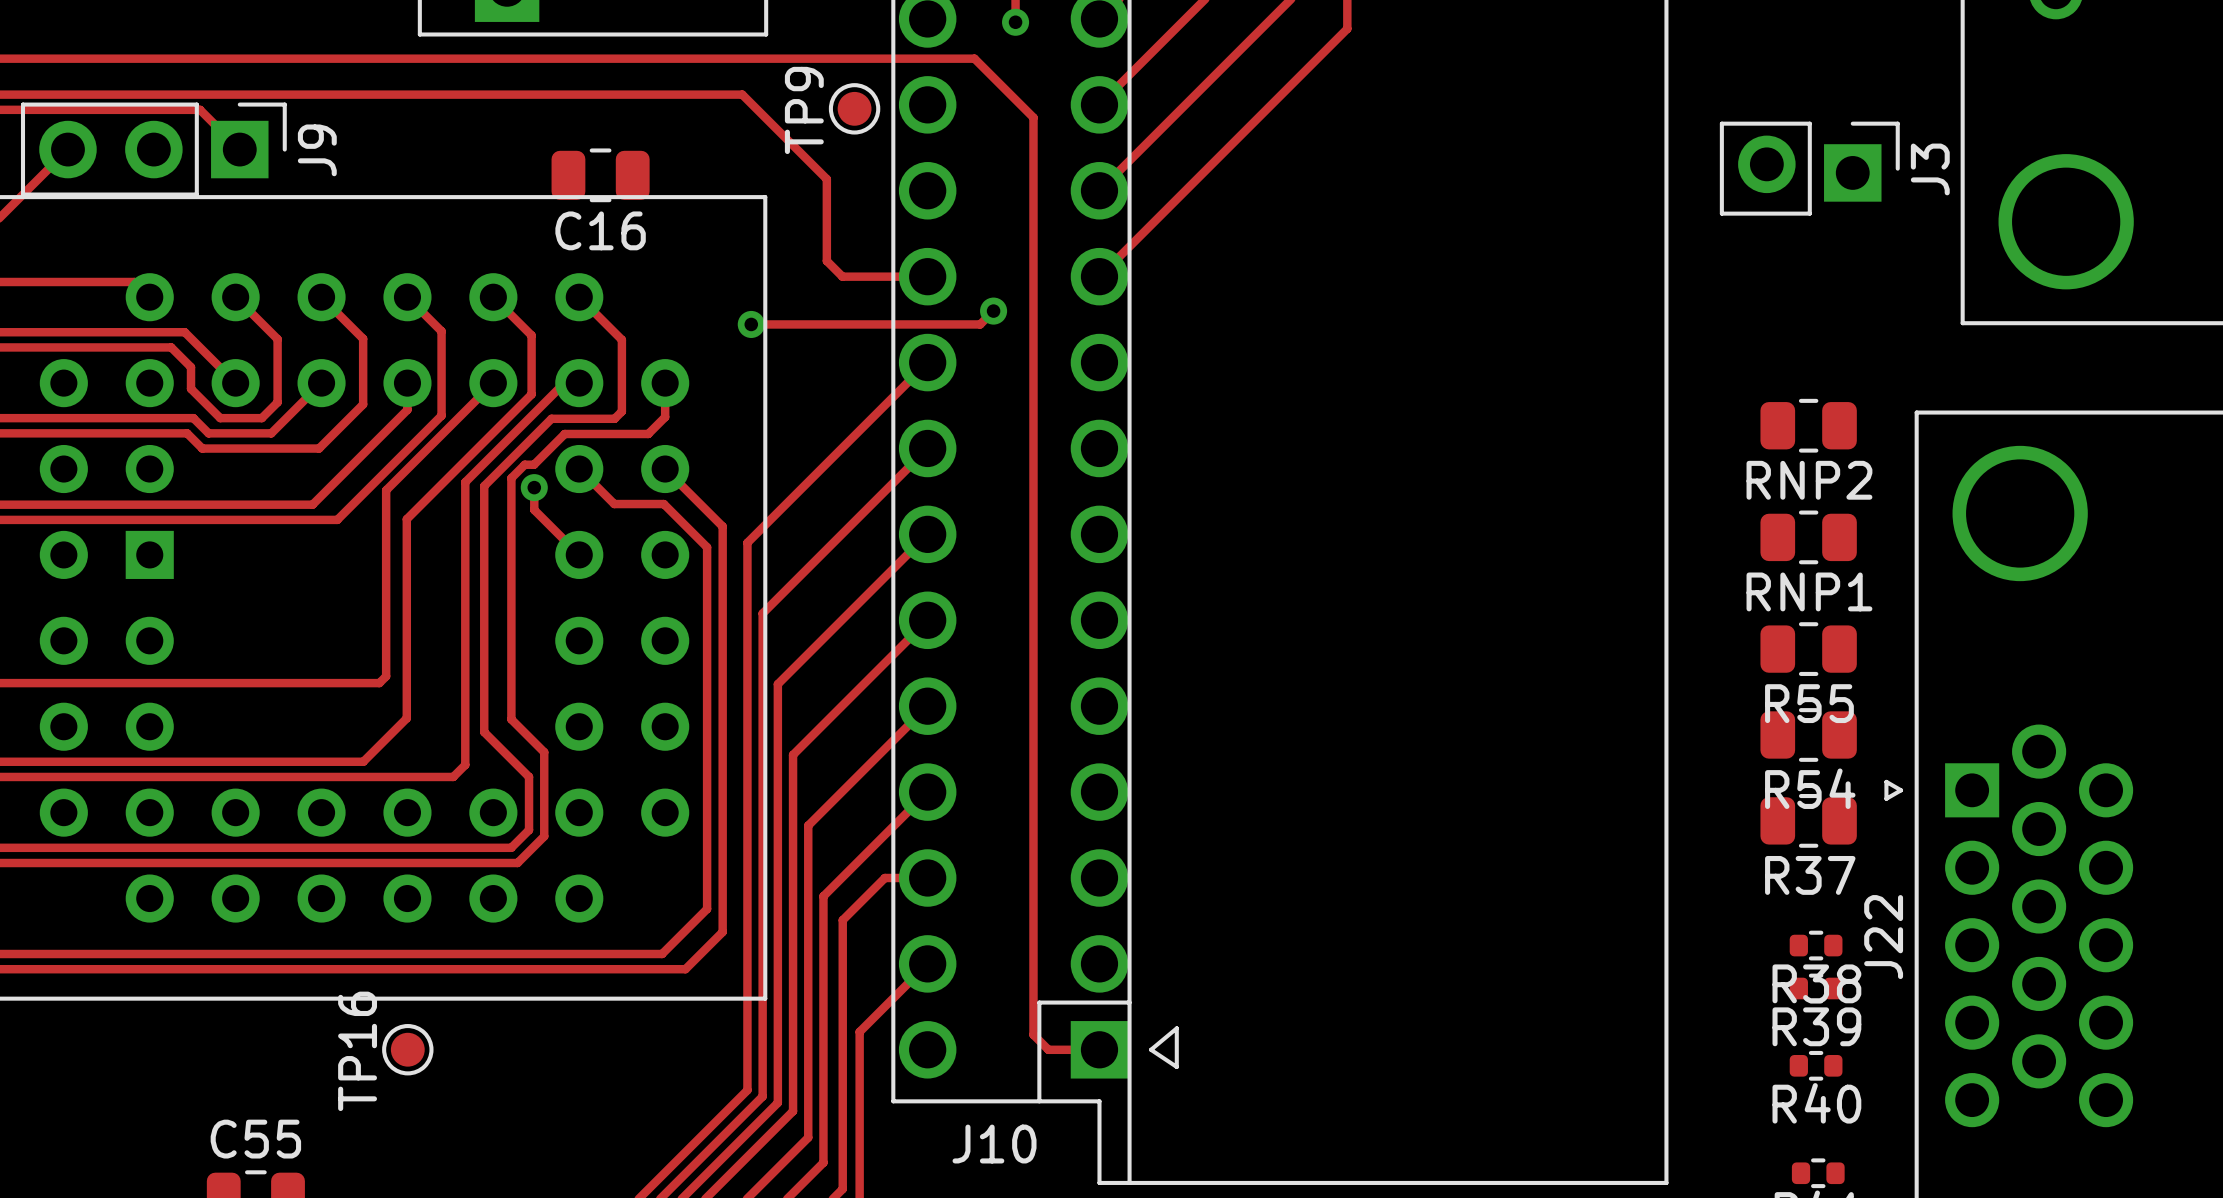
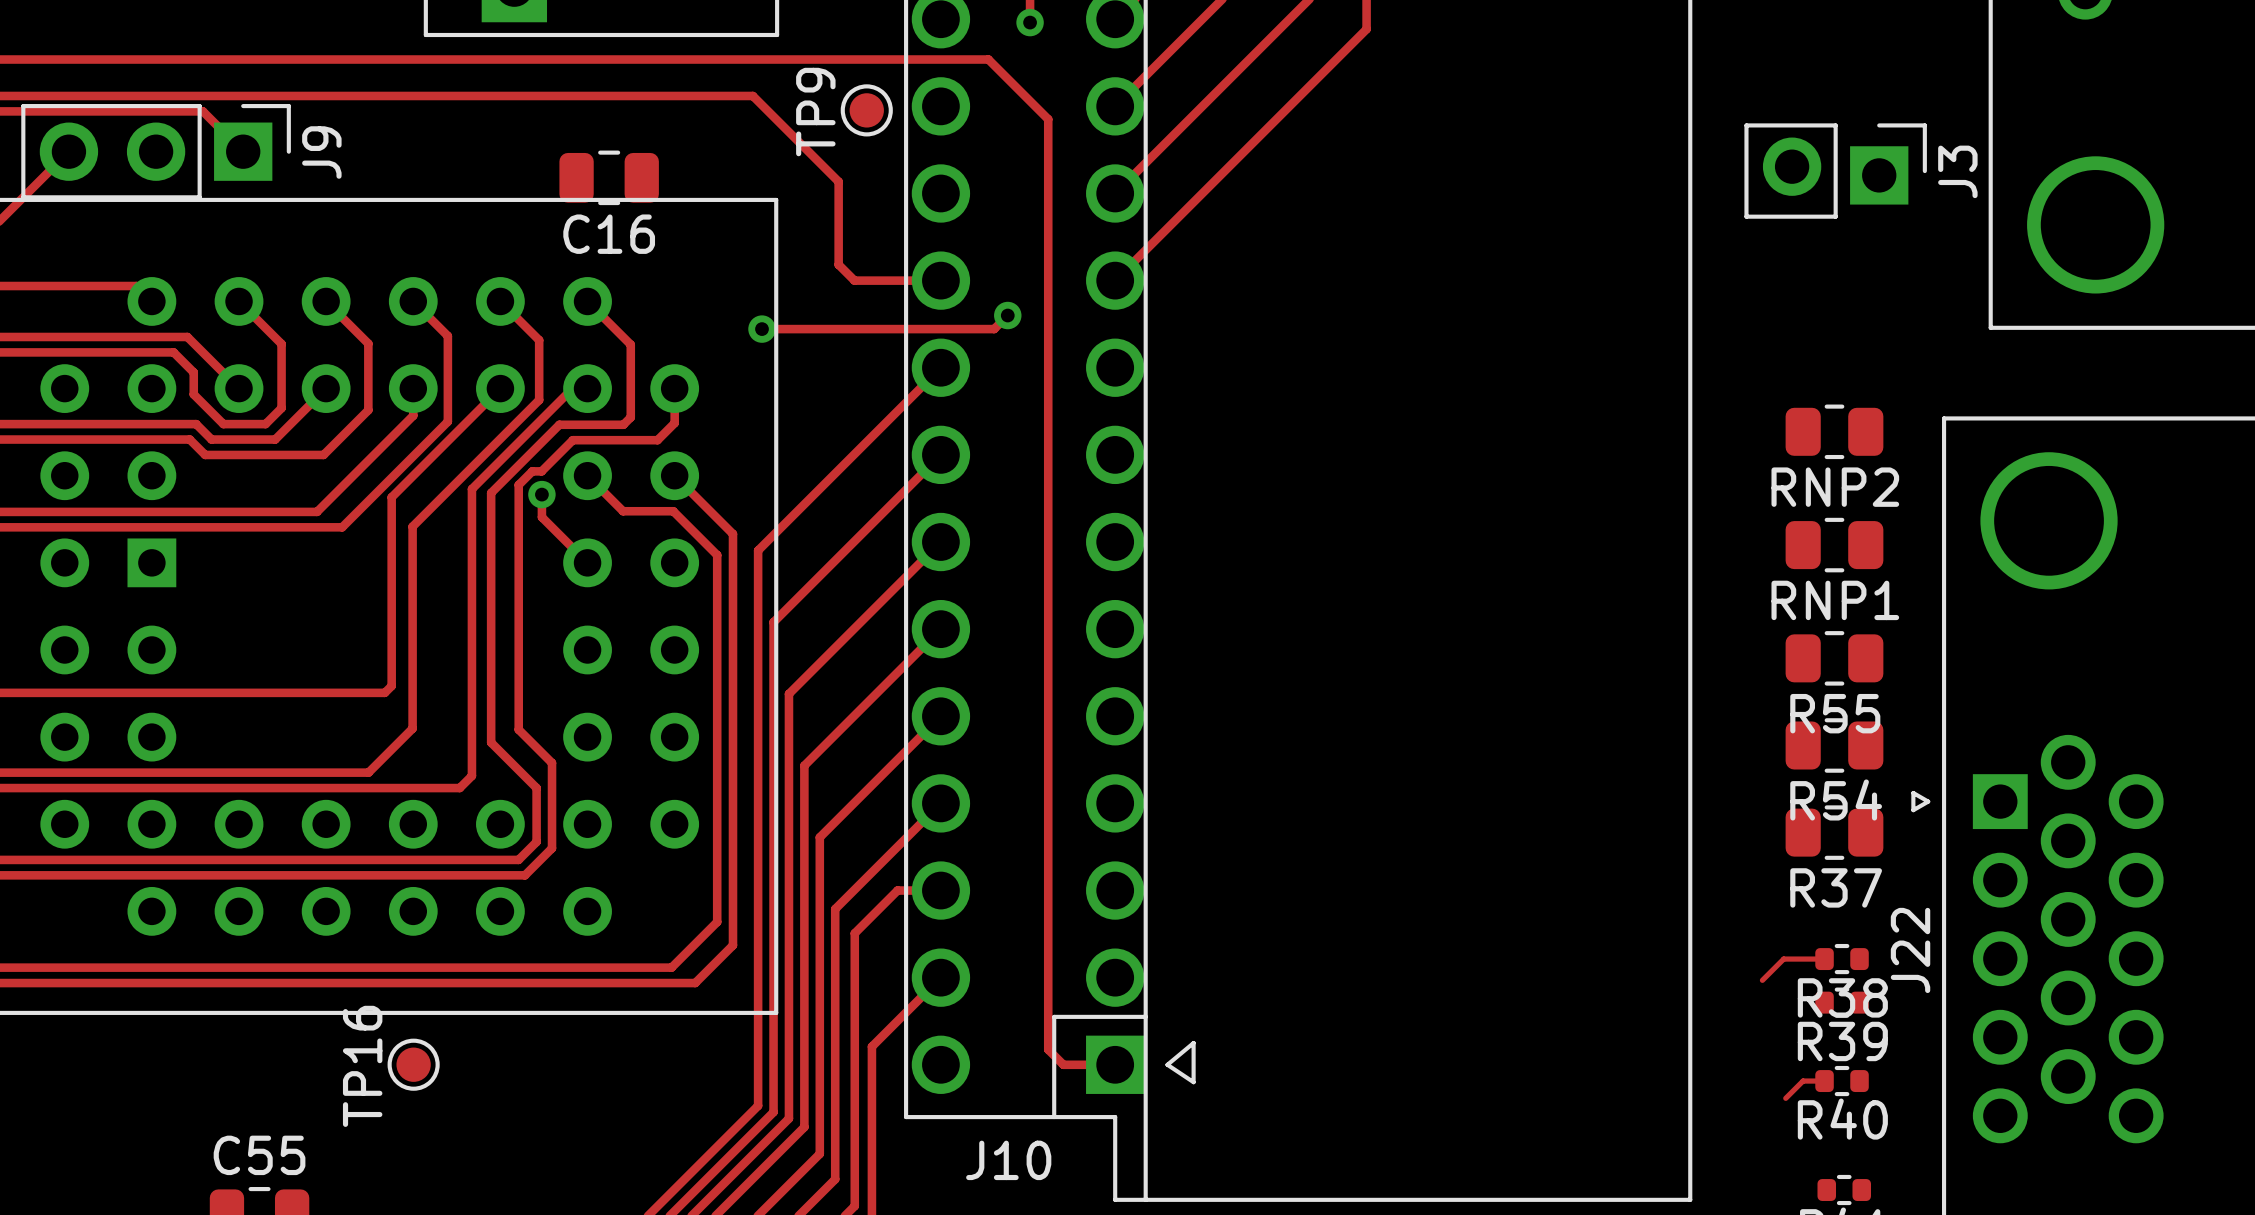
track: none -> (1824, 959) (1783, 959) (1762, 980)
track: none -> (1824, 1081) (1803, 1081) (1785, 1098)

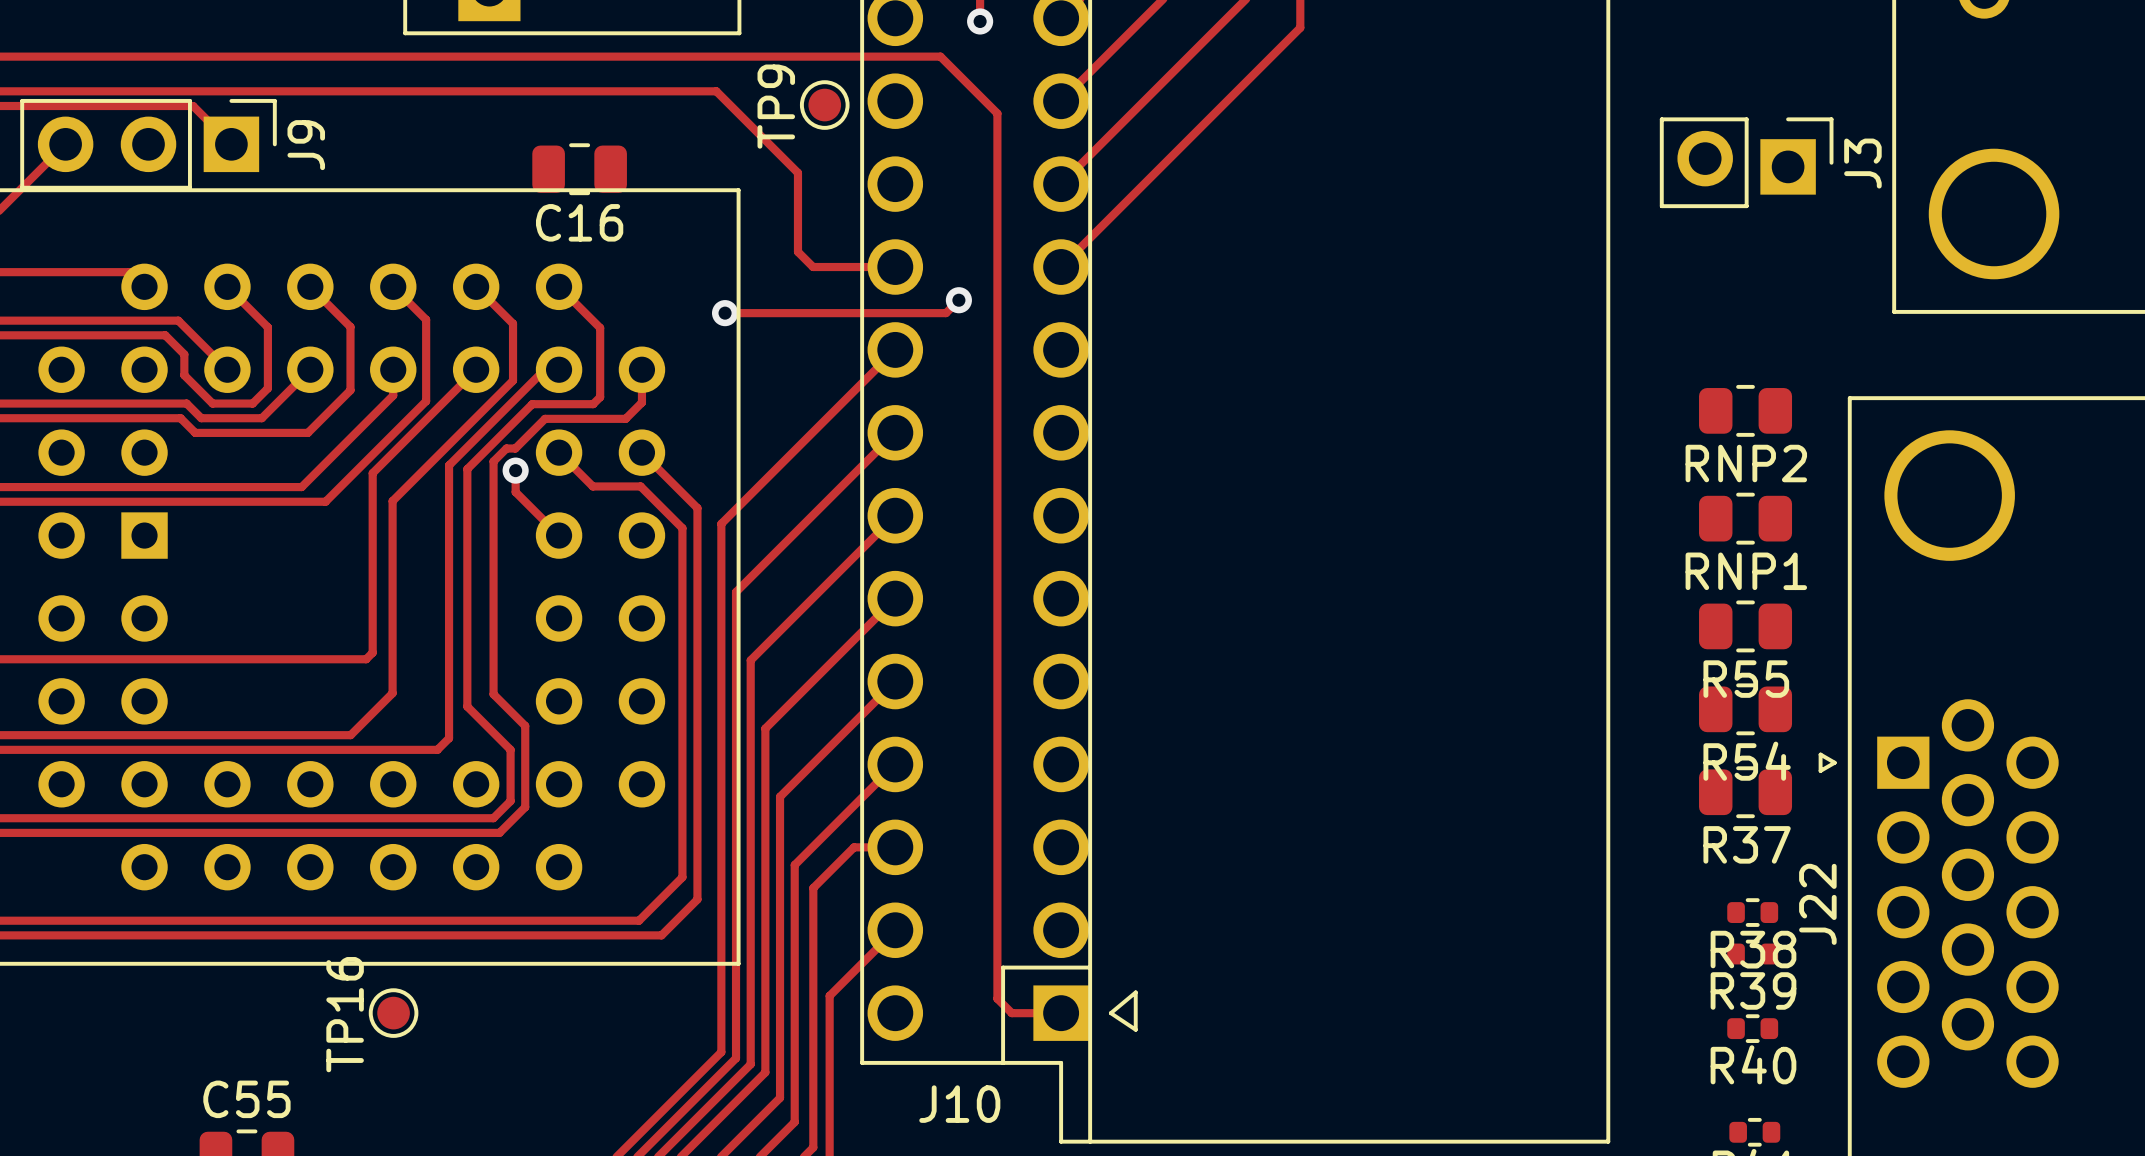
track: (1824, 959) (1783, 959) (1762, 980) -> none
track: (1824, 1081) (1803, 1081) (1785, 1098) -> none

